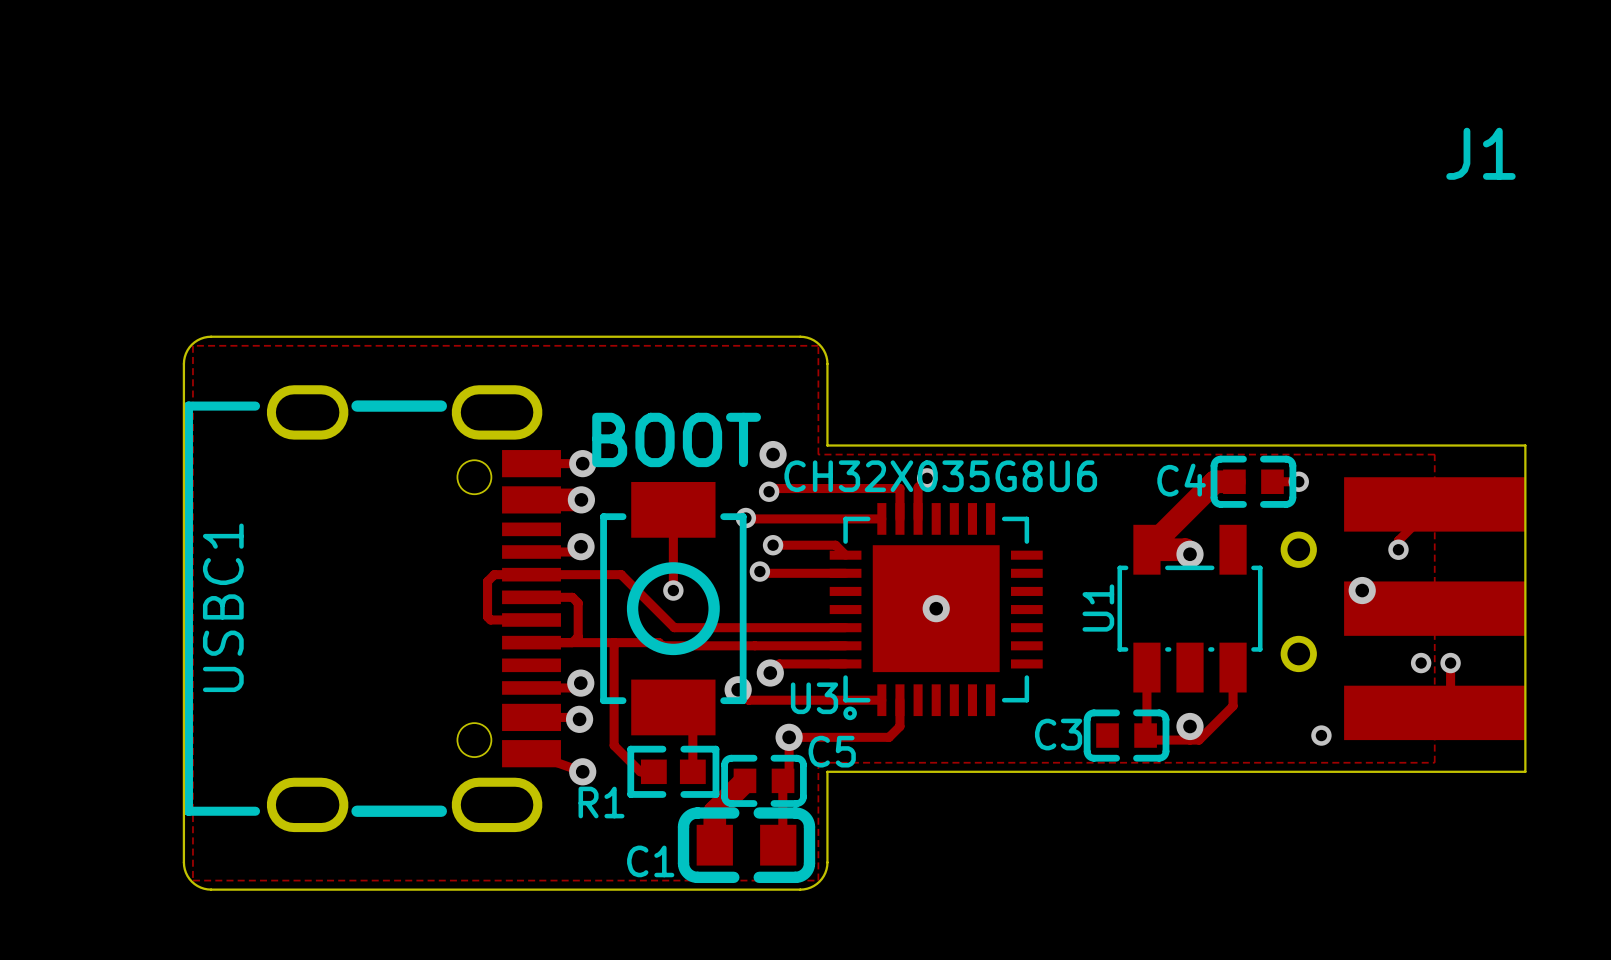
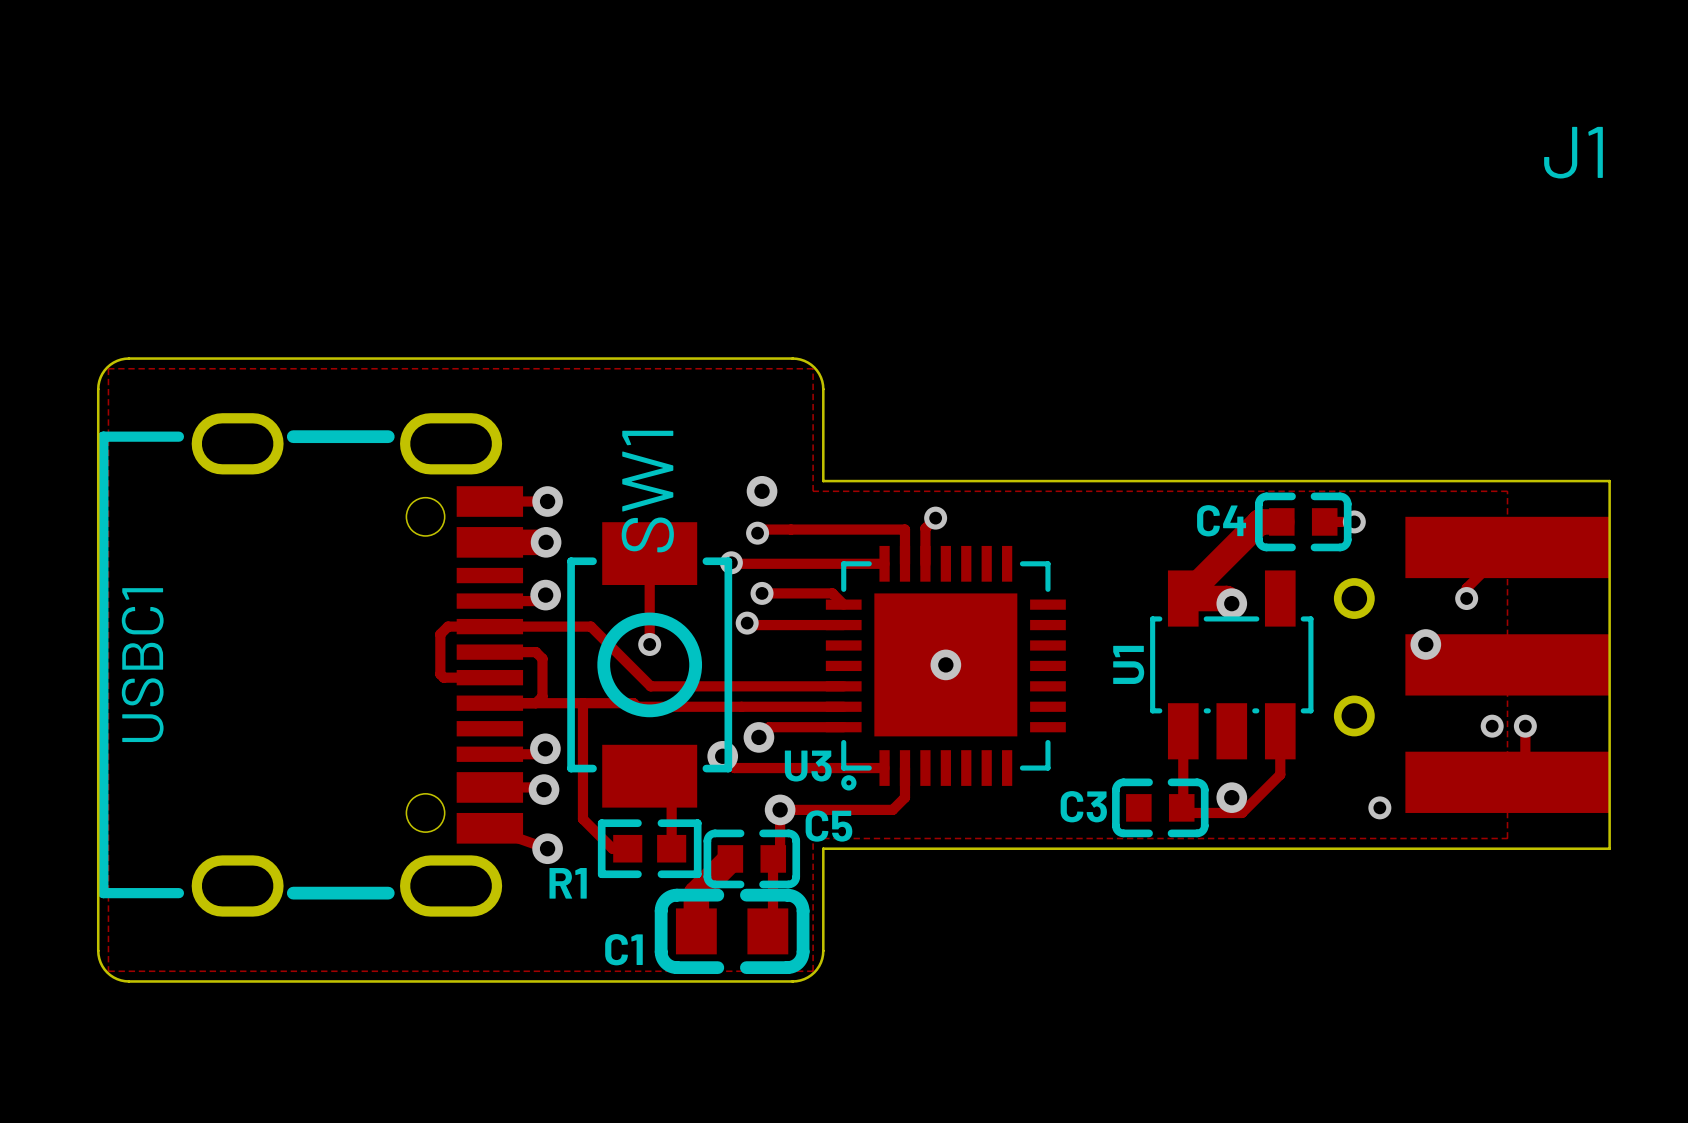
SW1 name: none -> SW1 (647, 491)
text: BOOT (676, 439) -> none
text: CH32X035G8U6 (940, 476) -> none

